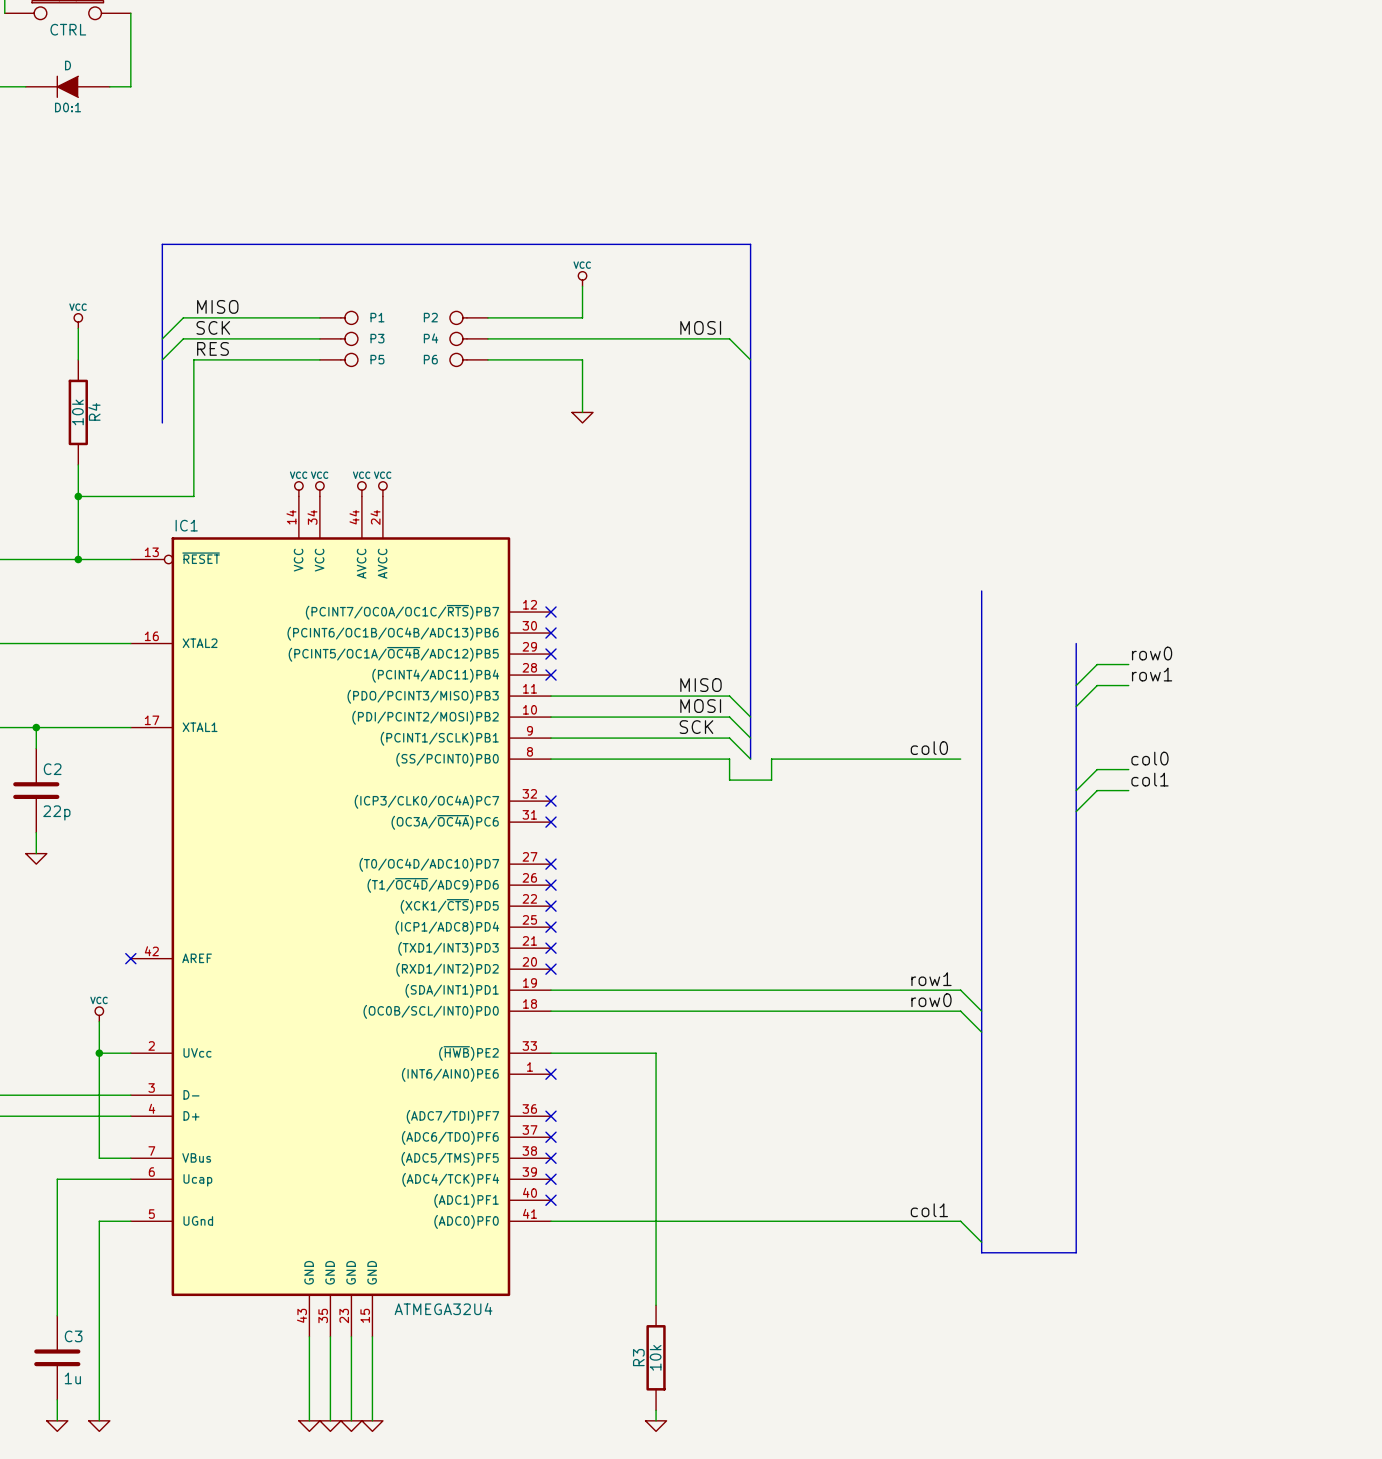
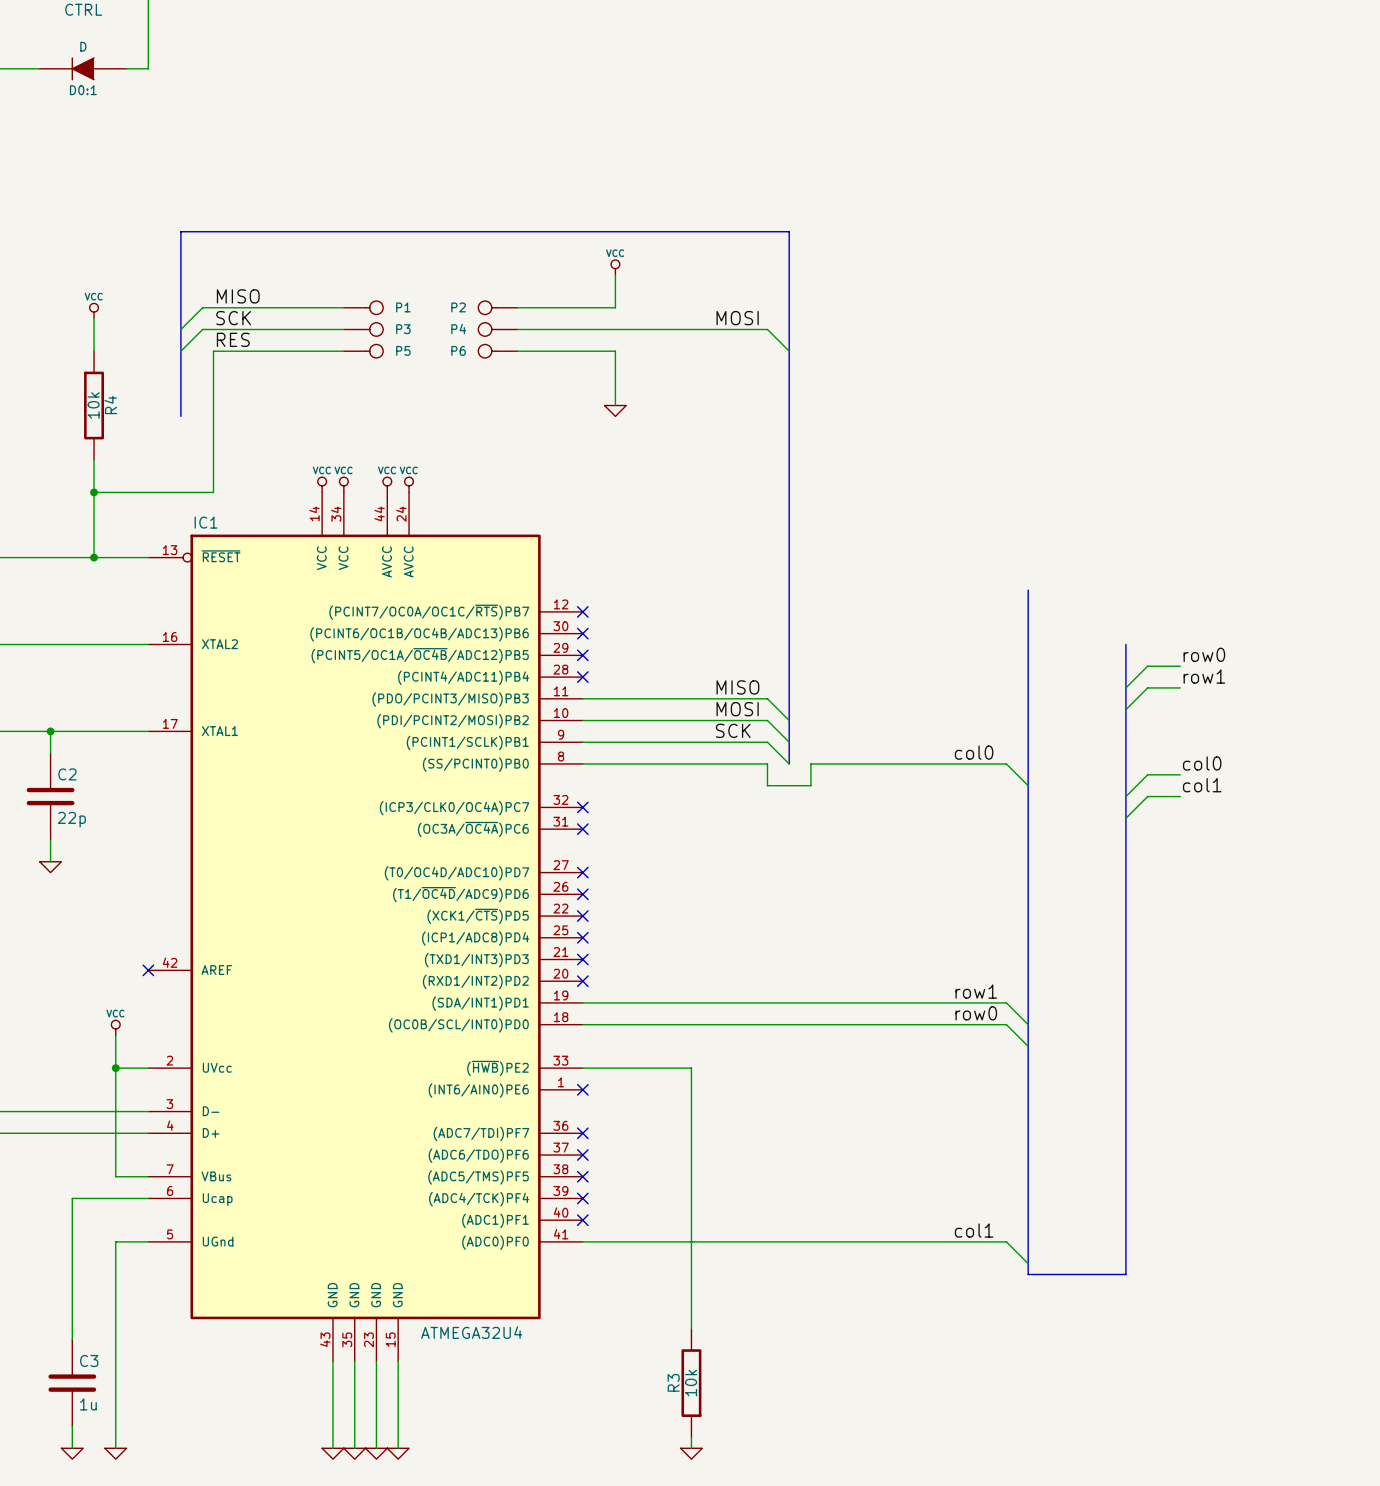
wire: none -> (1006, 763) (1028, 785)

